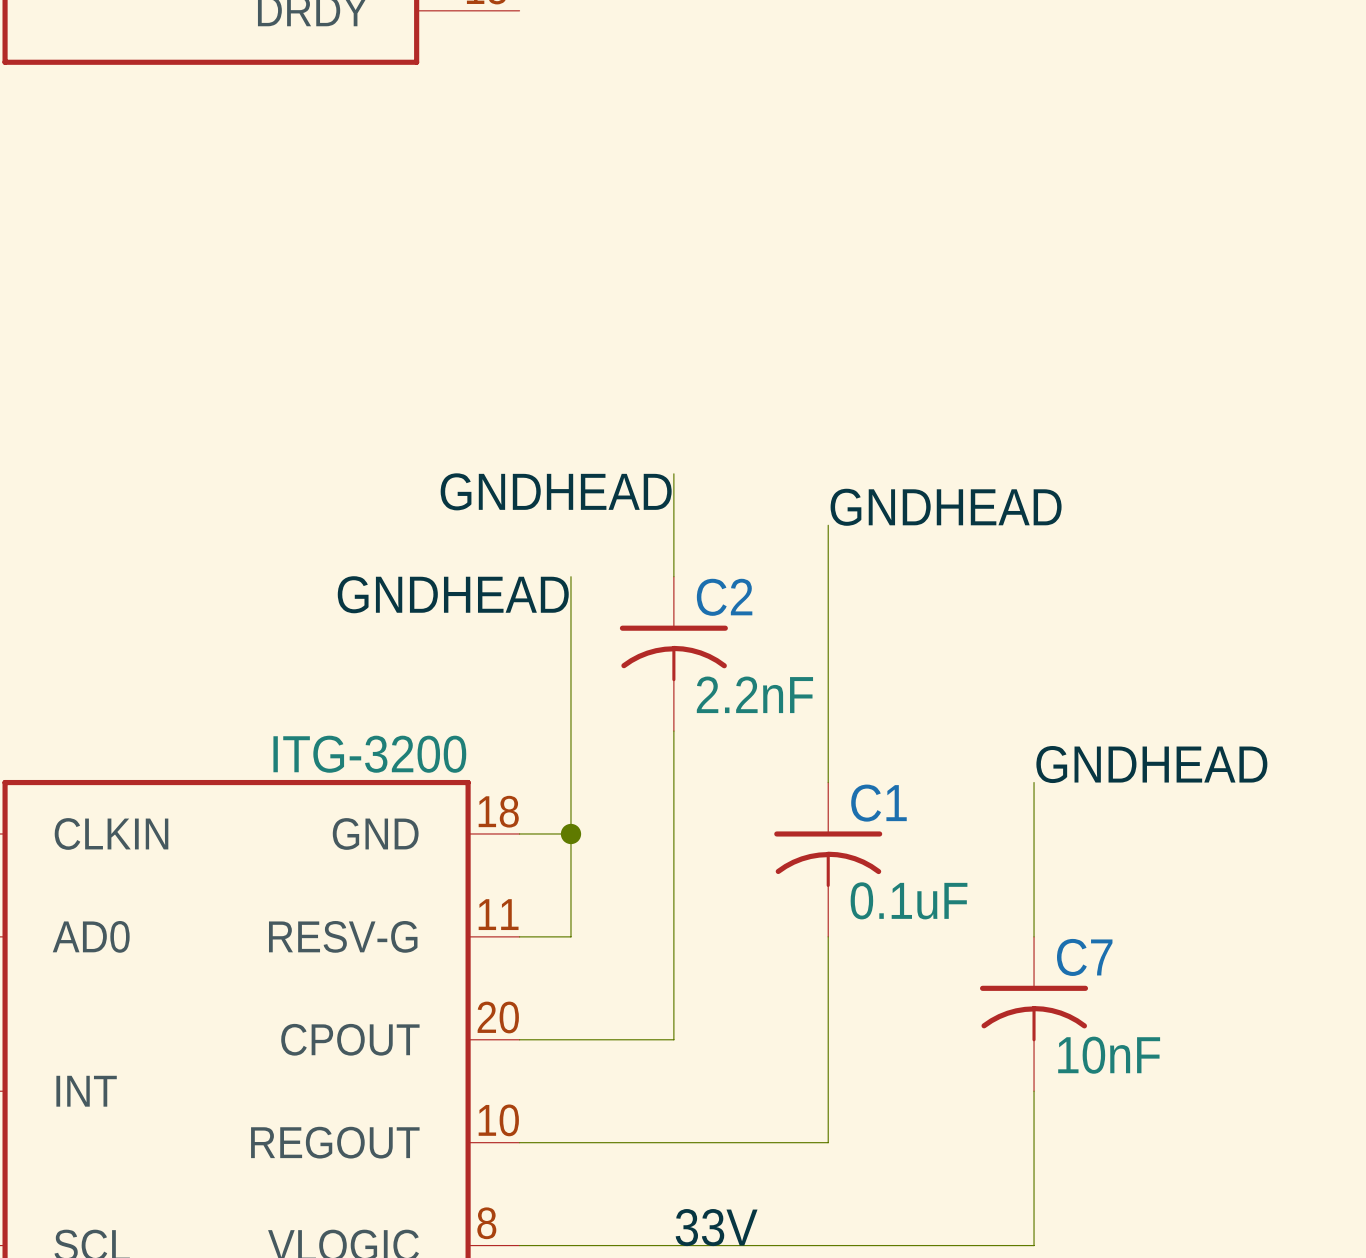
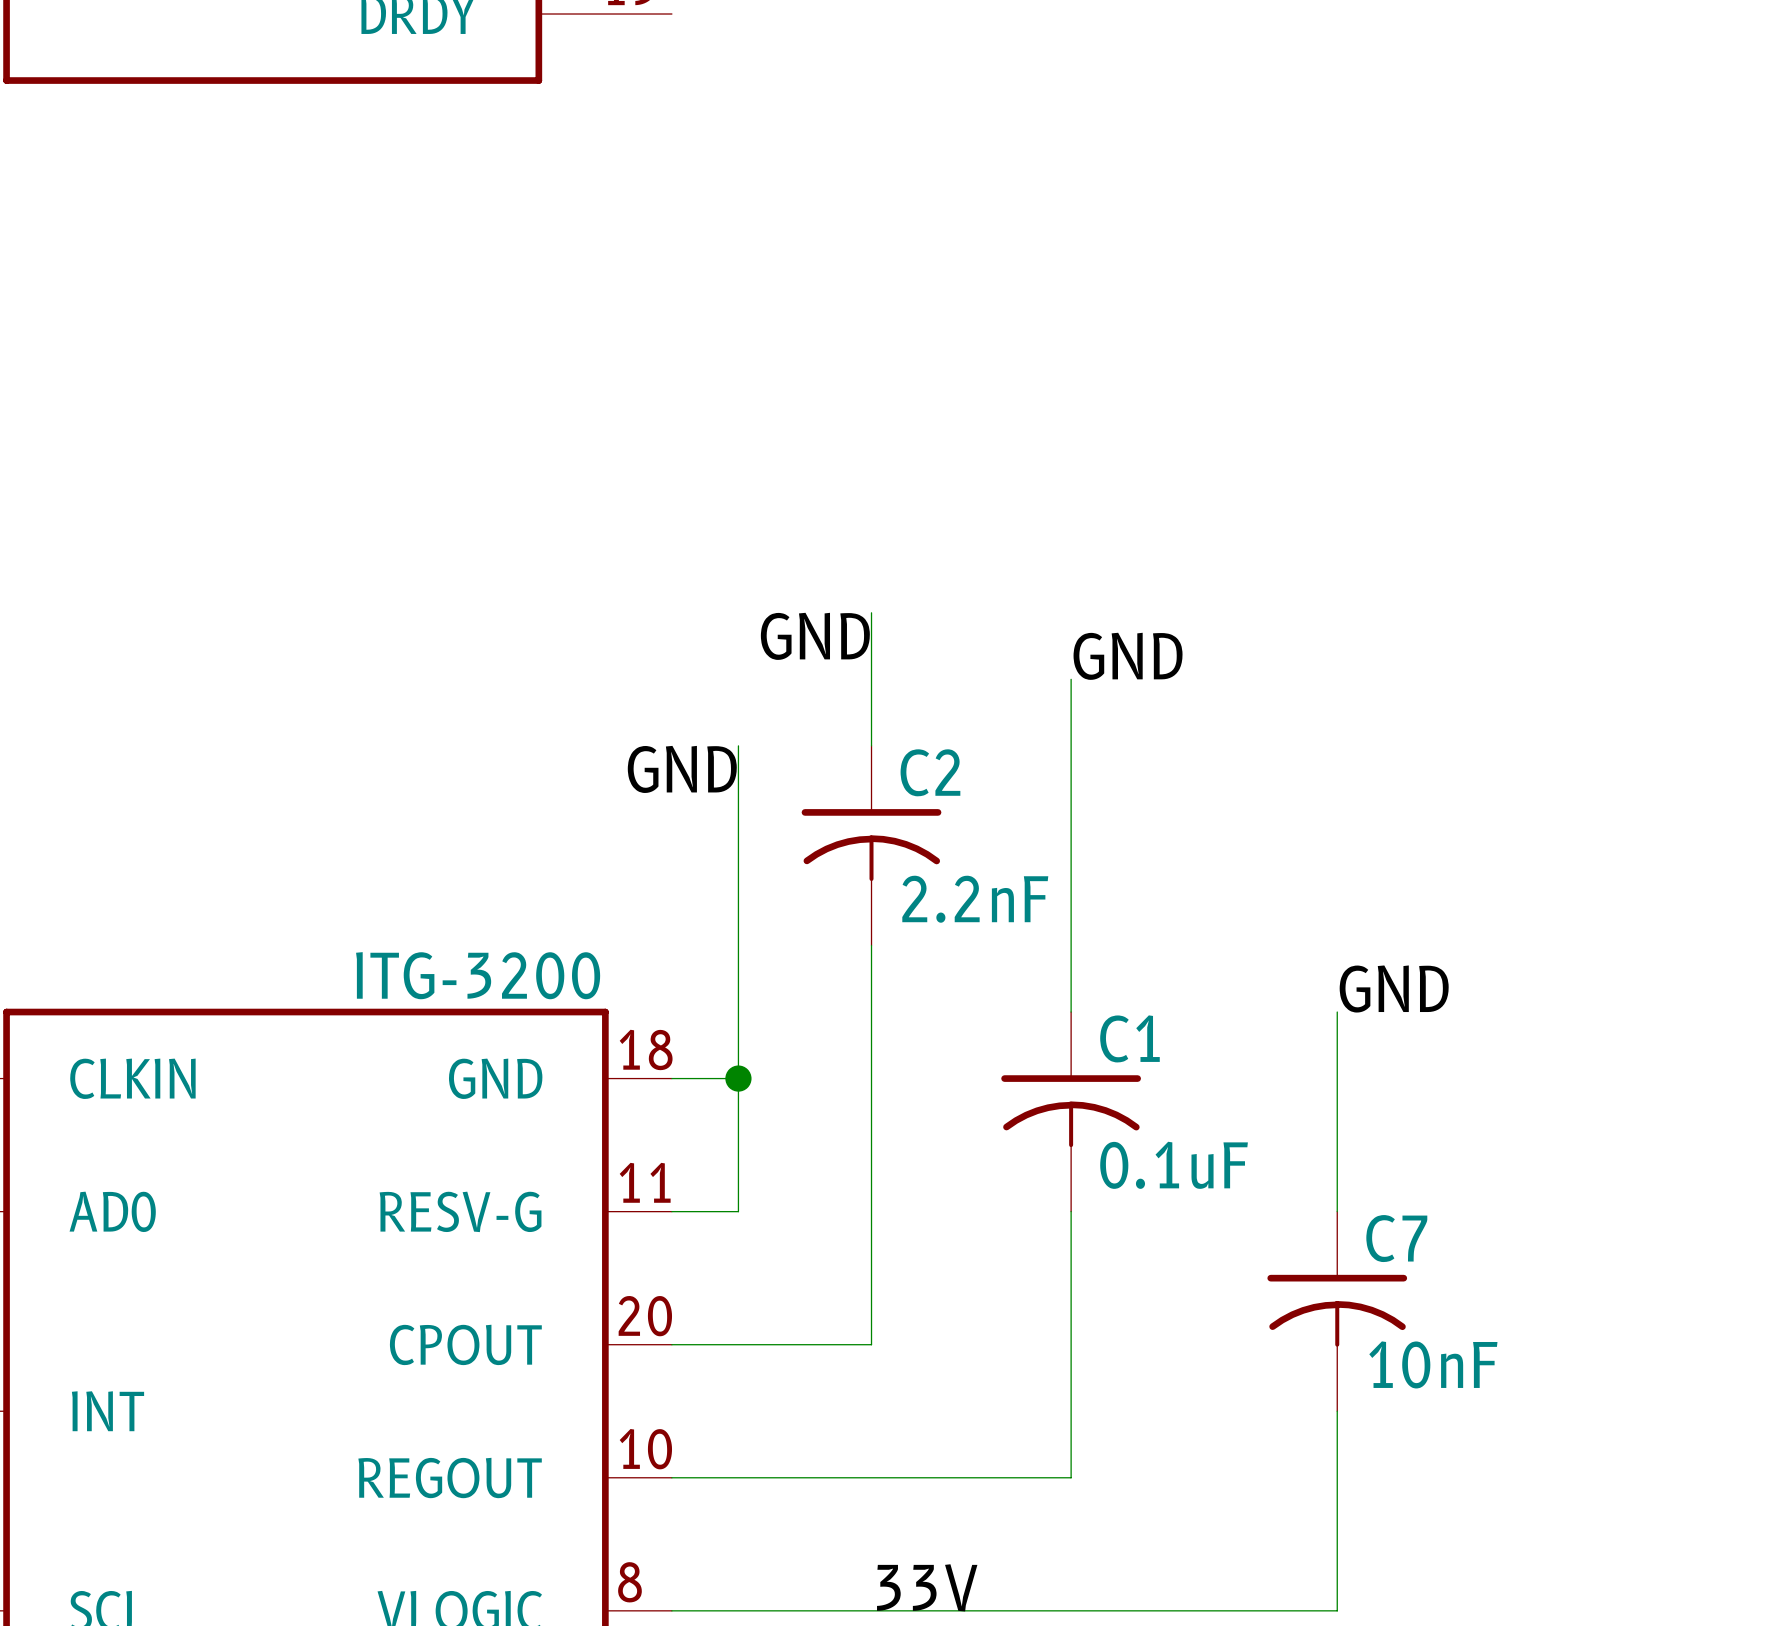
label: GNDHEAD (556, 491) -> GND (815, 636)
label: GNDHEAD (946, 507) -> GND (1128, 656)
label: GNDHEAD (453, 594) -> GND (682, 769)
label: GNDHEAD (1151, 764) -> GND (1394, 989)

